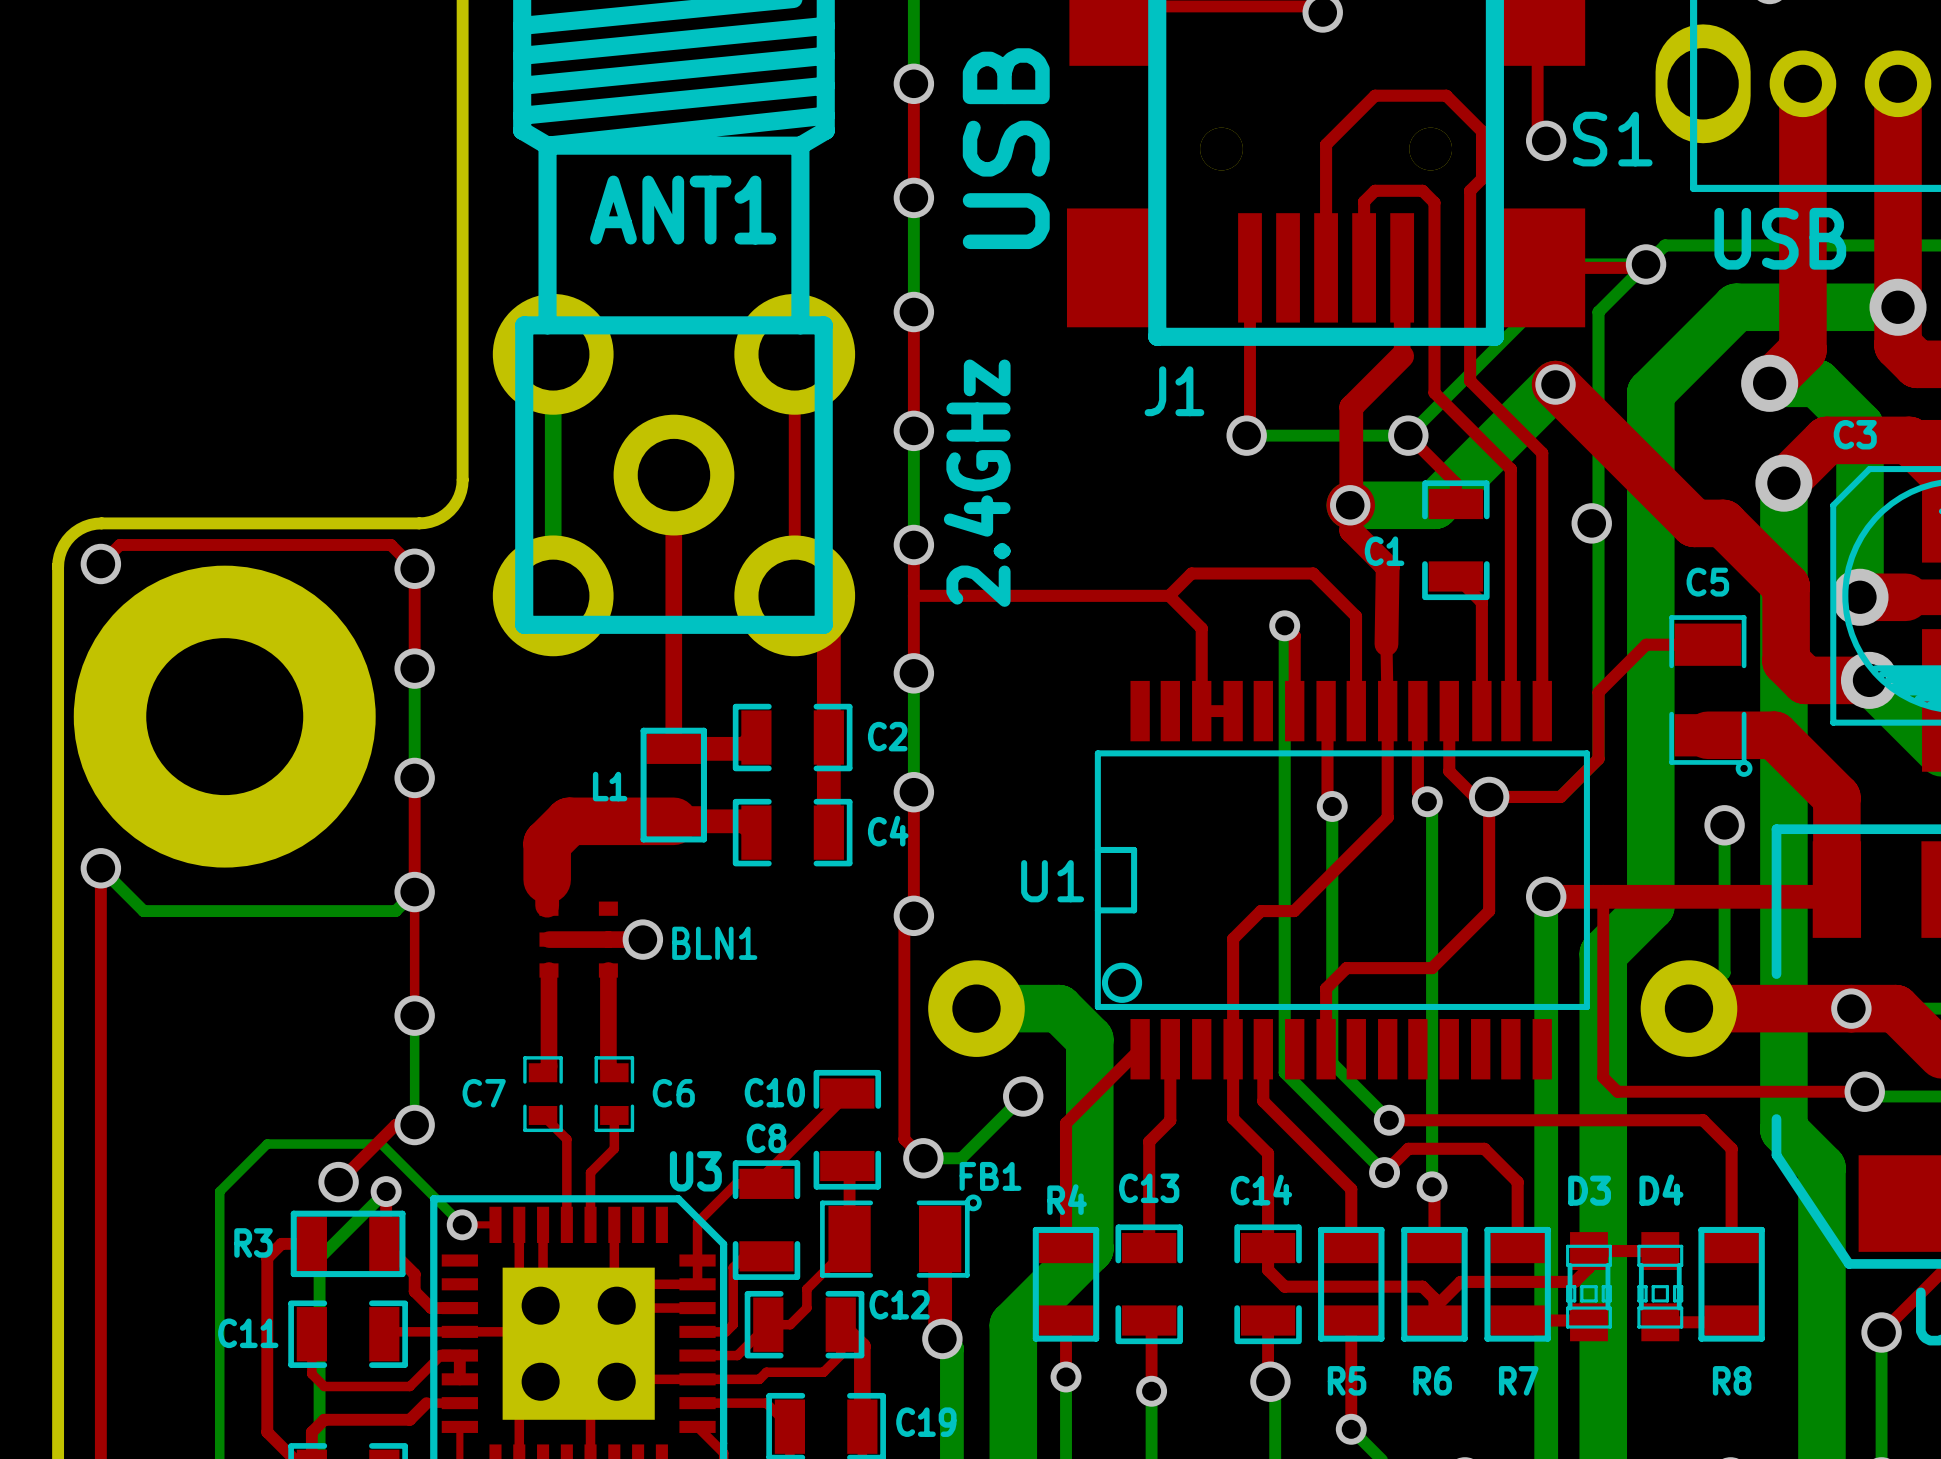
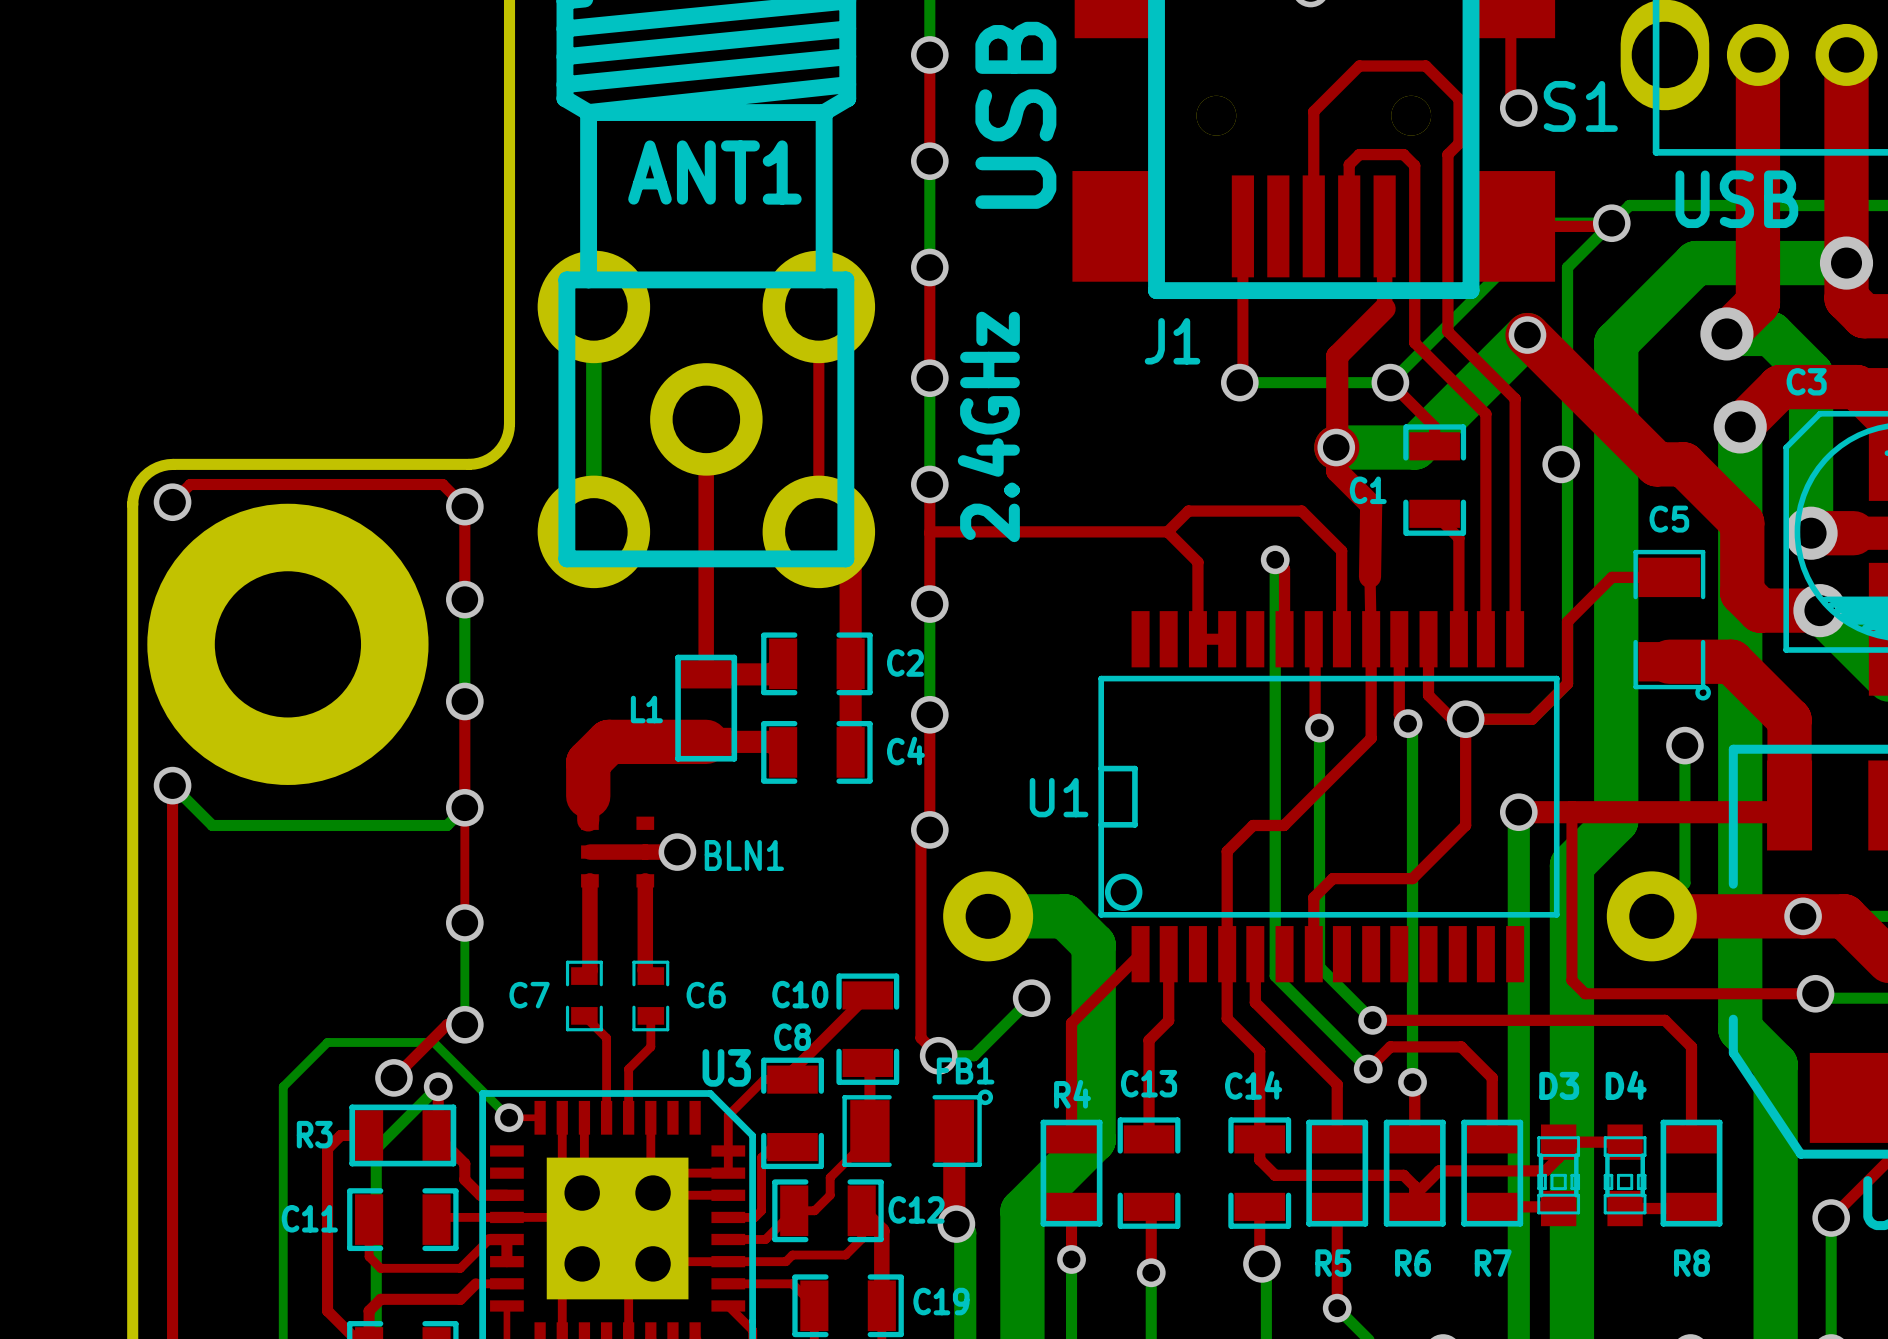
FB1 name position: FB1 (990, 1176) -> FB1 (965, 1070)
C12 name position: C12 (899, 1304) -> C12 (916, 1209)

